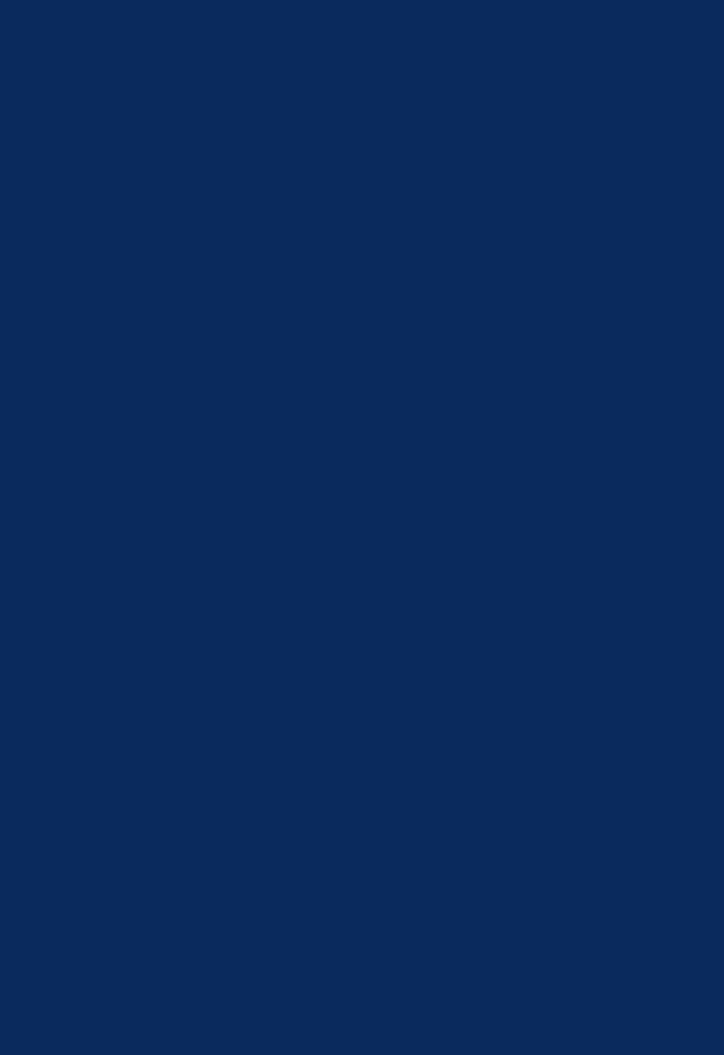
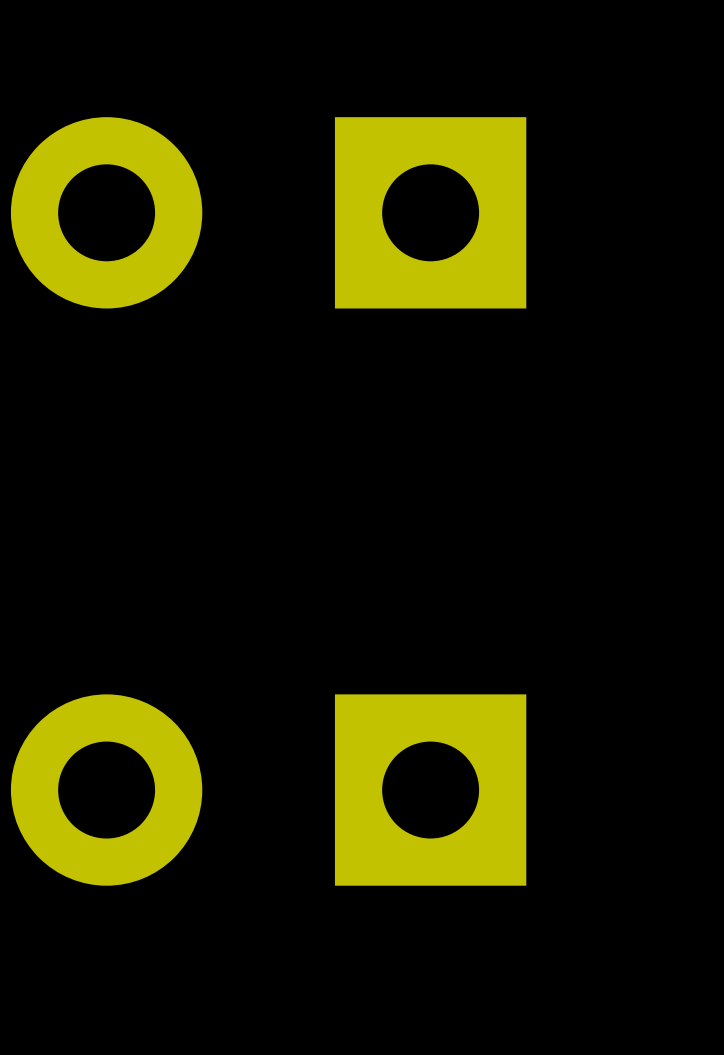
part: none -> (268, 212)
part: none -> (268, 790)

